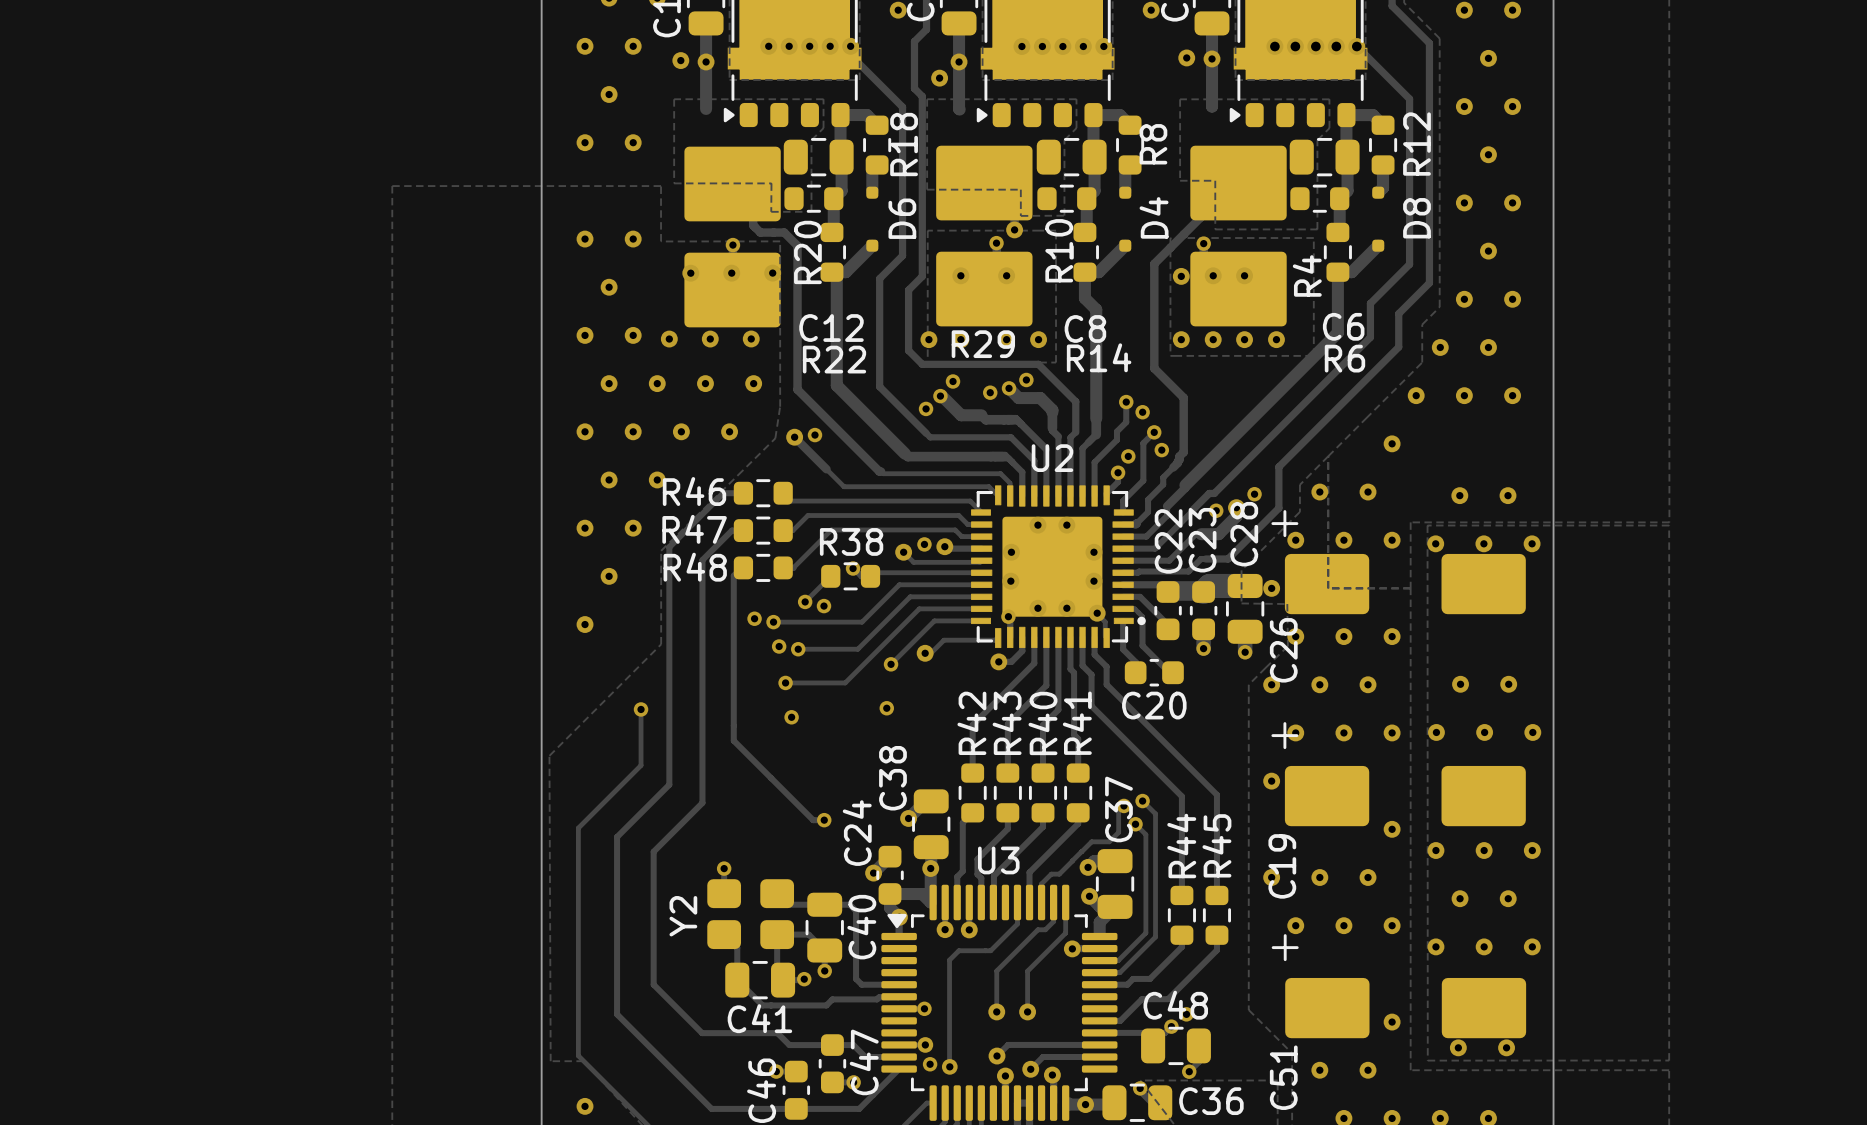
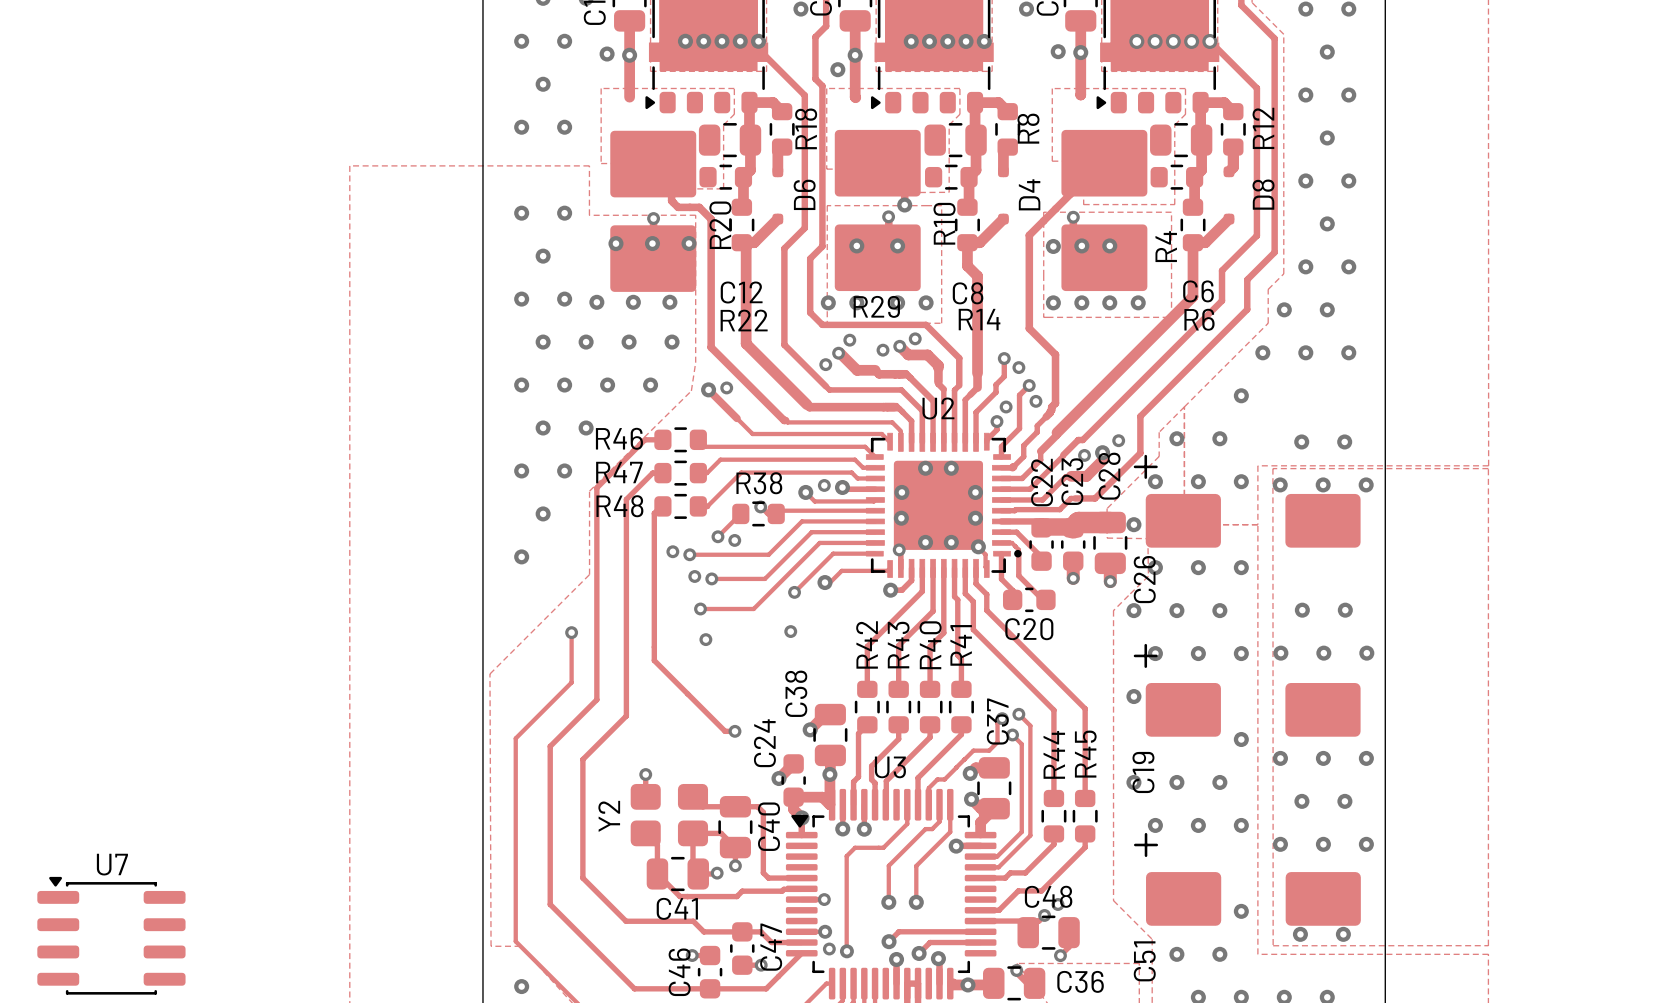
U7: none -> (111, 935)

